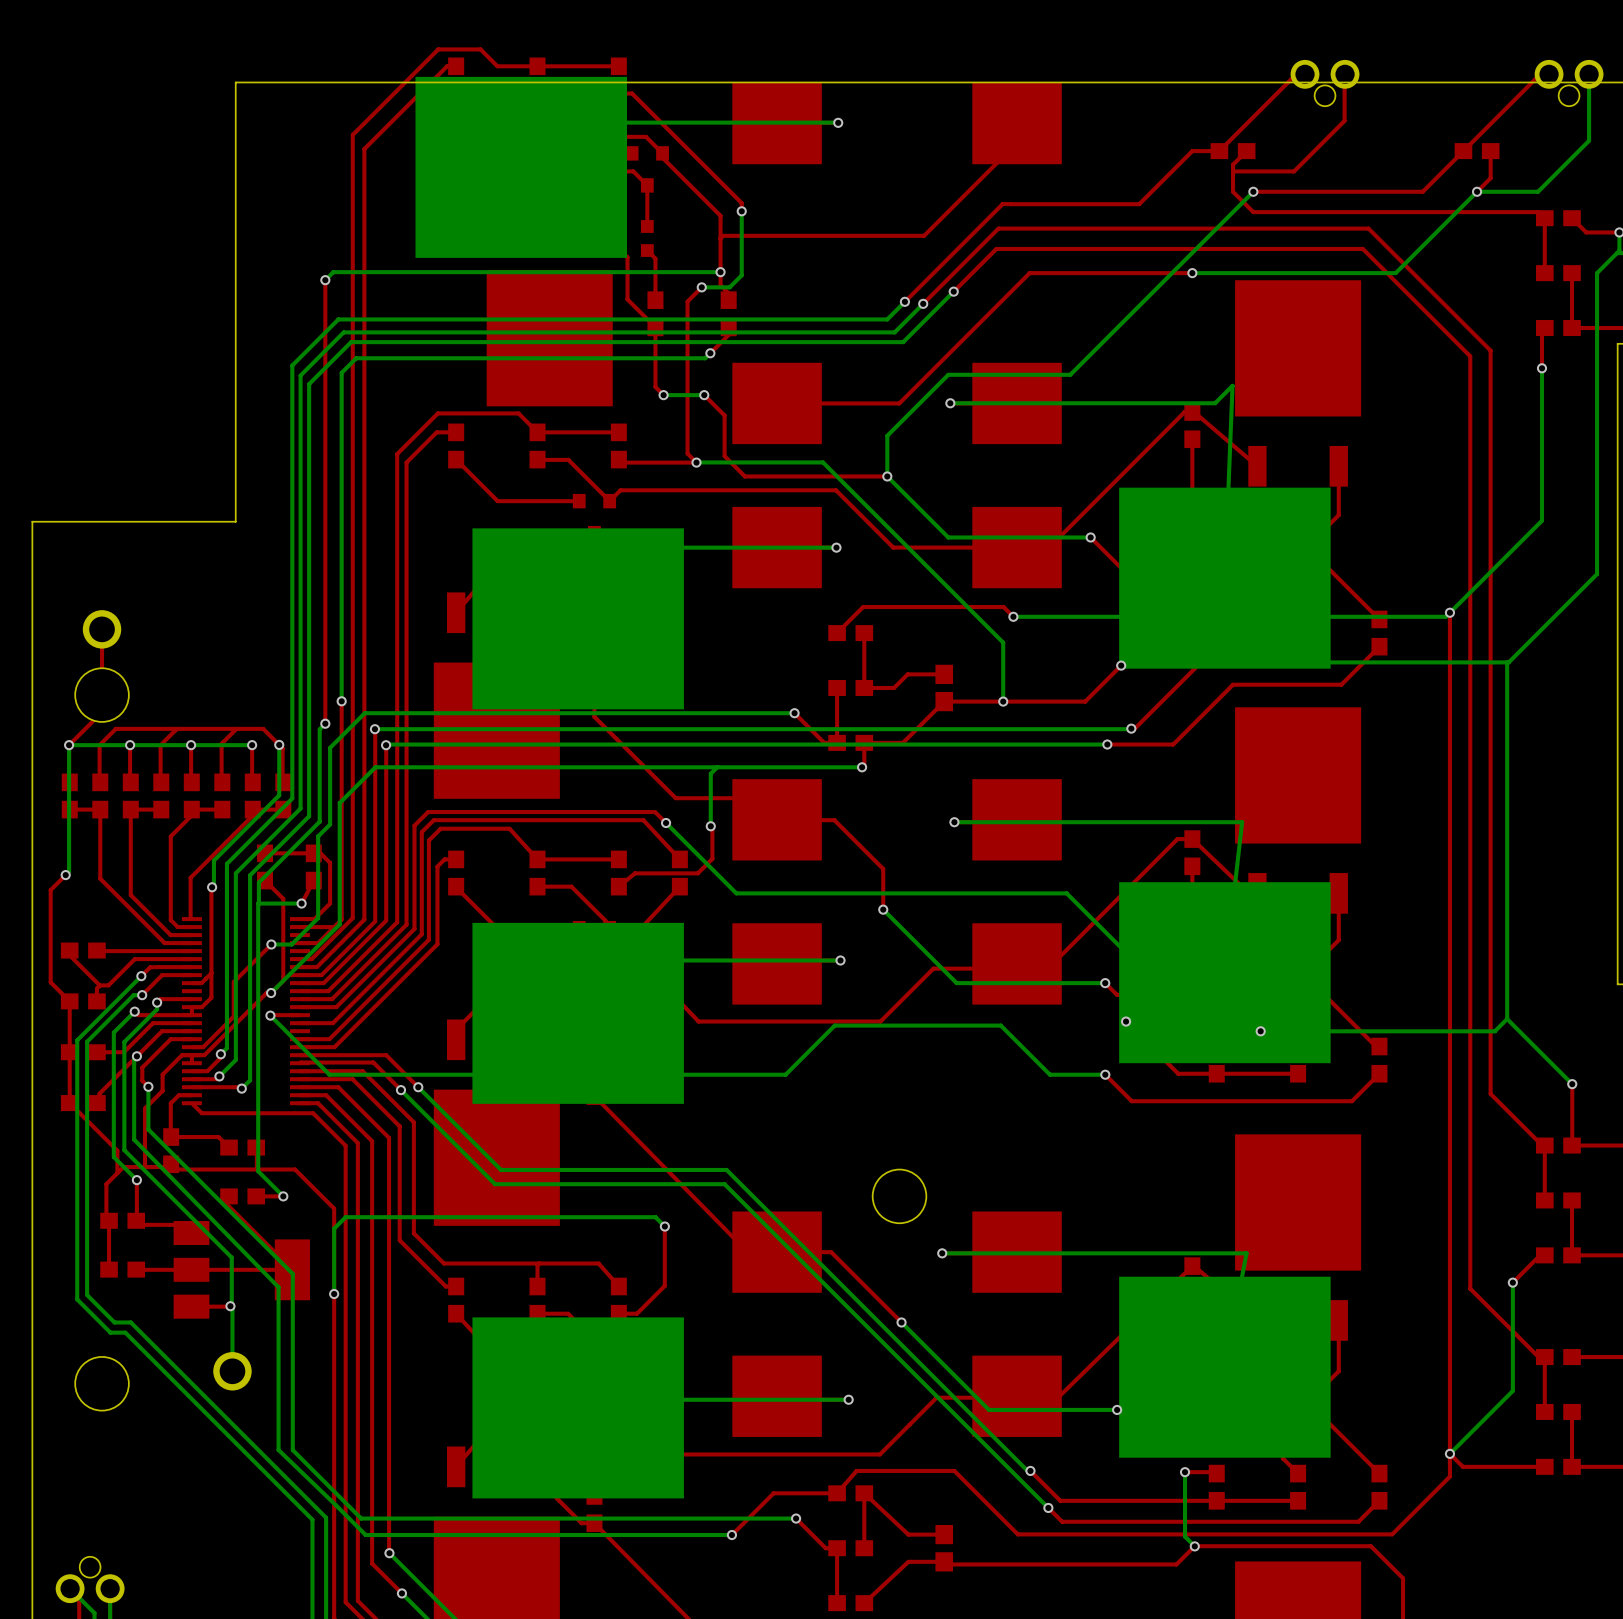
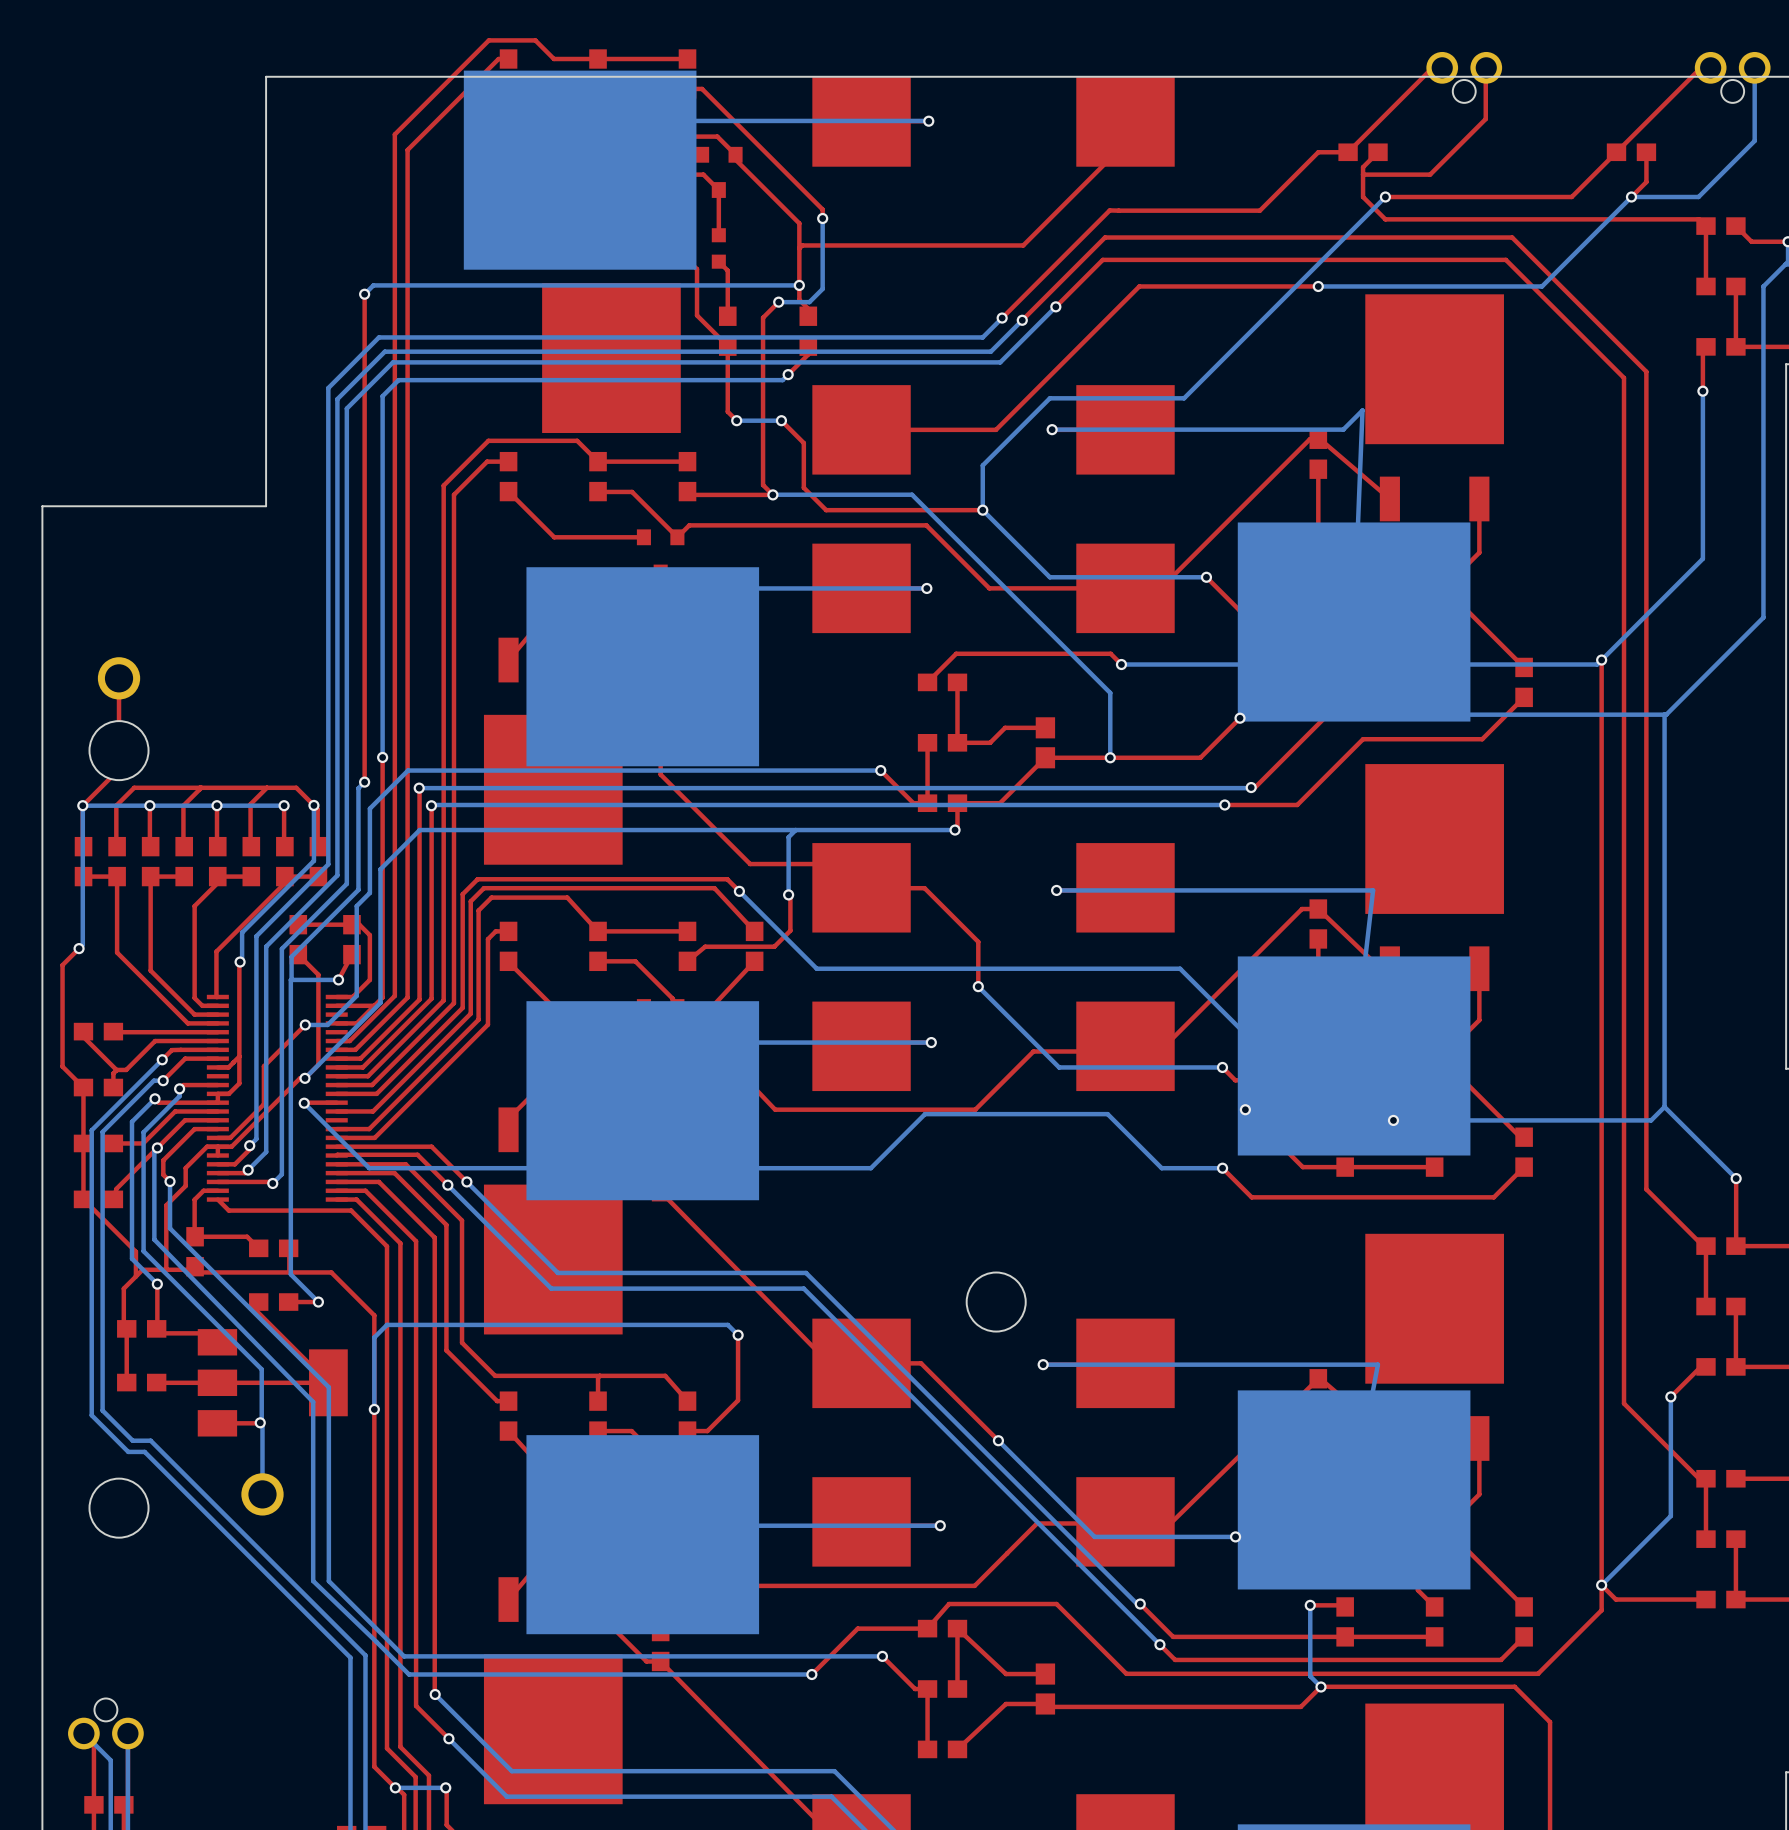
board edge: (235, 472) (235, 521) (32, 521) -> (266, 506) (42, 506) (42, 559)

